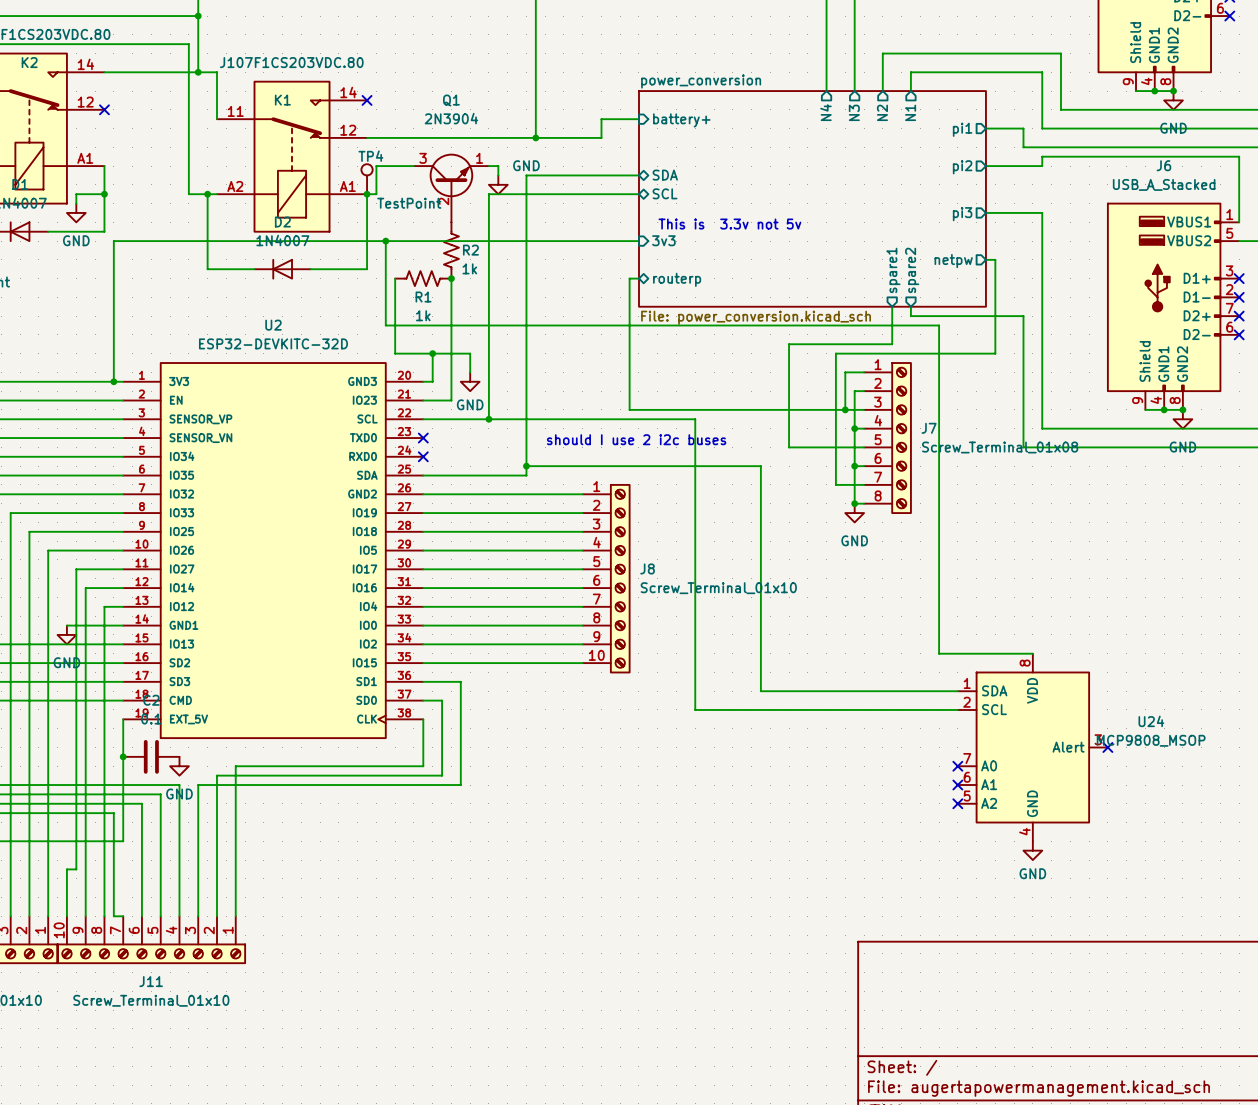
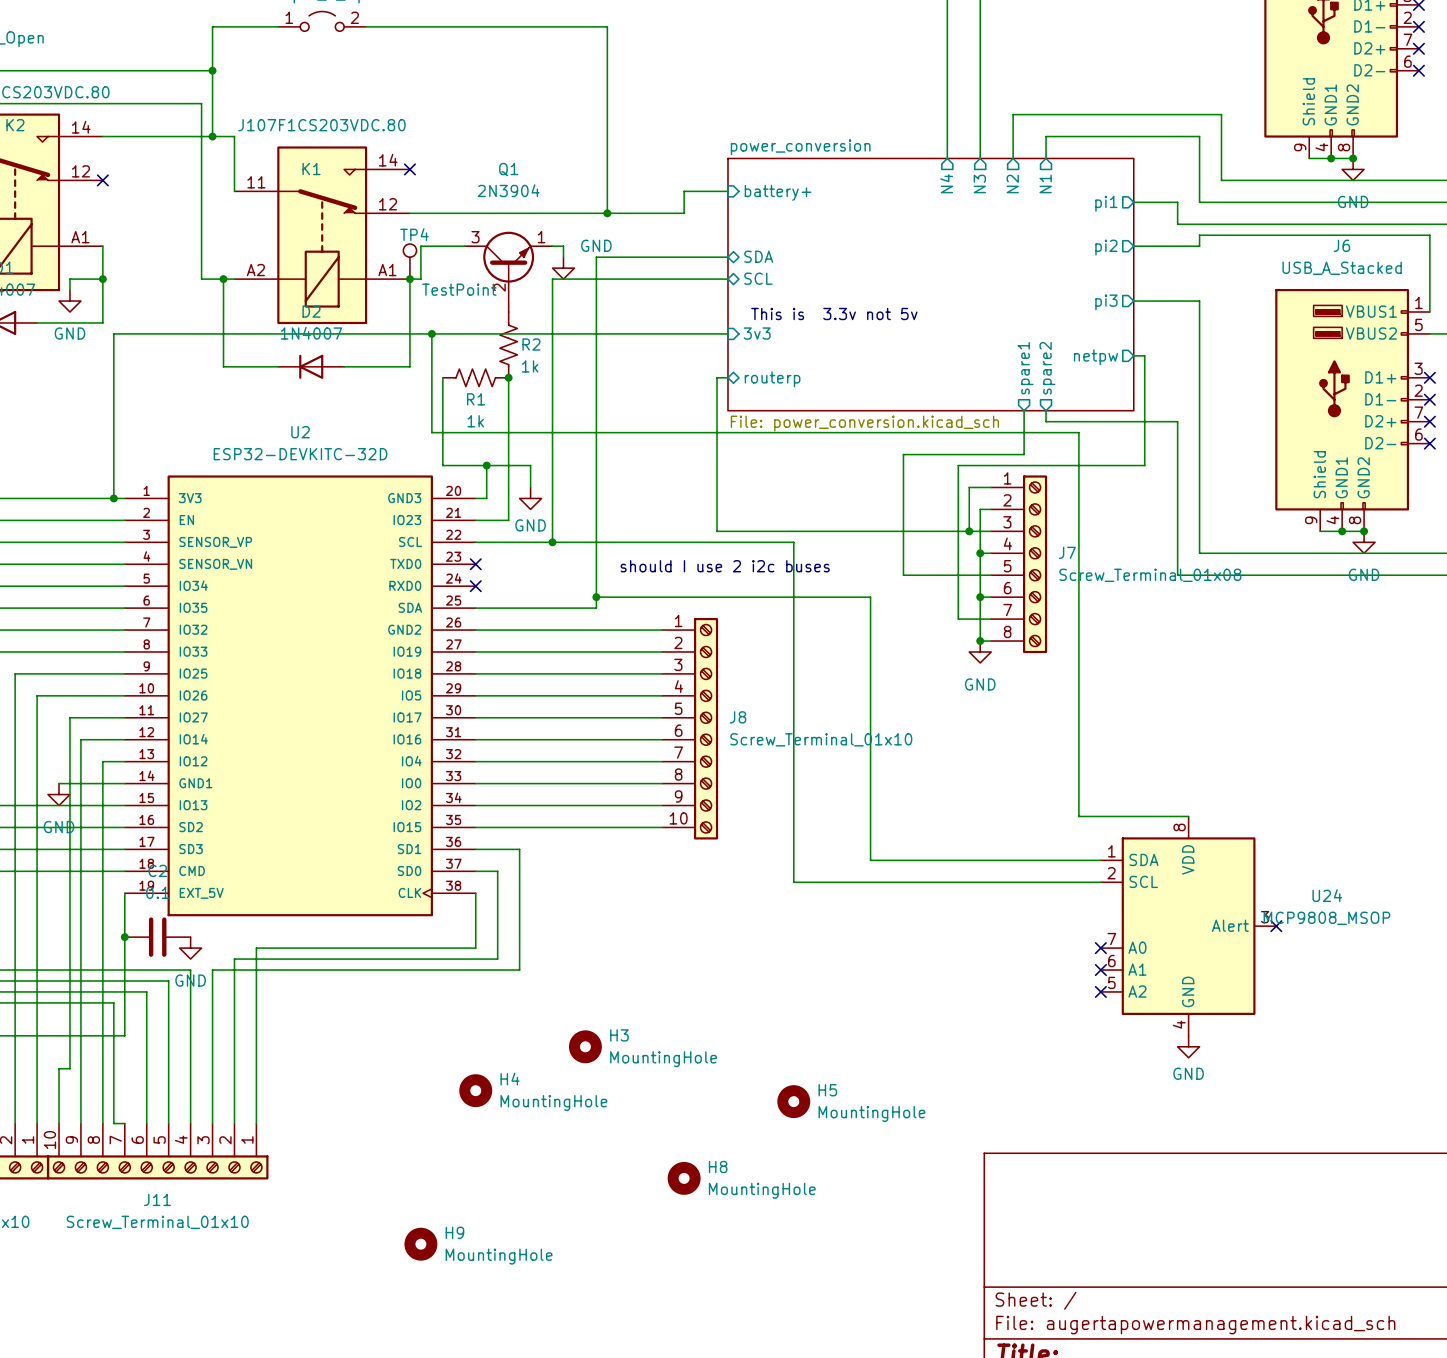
H3: none -> MountingHole (585, 1046)
H4: none -> MountingHole (475, 1090)
H5: none -> MountingHole (793, 1101)
H8: none -> MountingHole (684, 1178)
H9: none -> MountingHole (420, 1244)

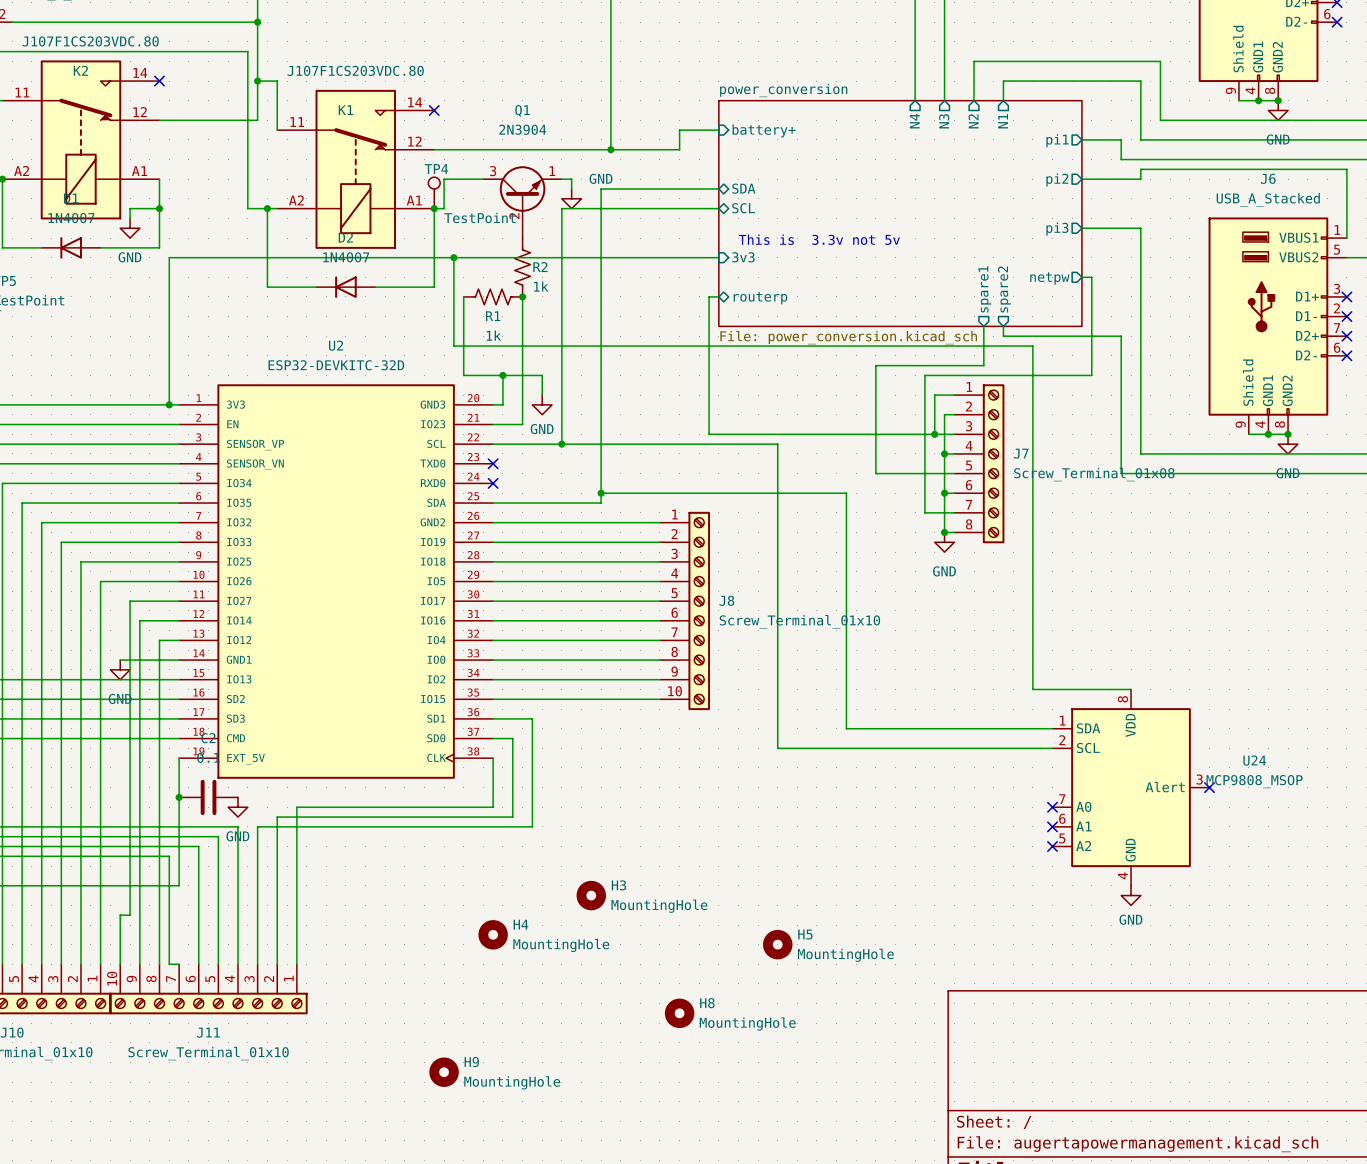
wire: (102, 136) (212, 136) -> (159, 120) (257, 120) (257, 81)
no-connect mark position: (102, 180) -> (159, 81)
text: should I use 2 i2c buses (725, 566) -> none

